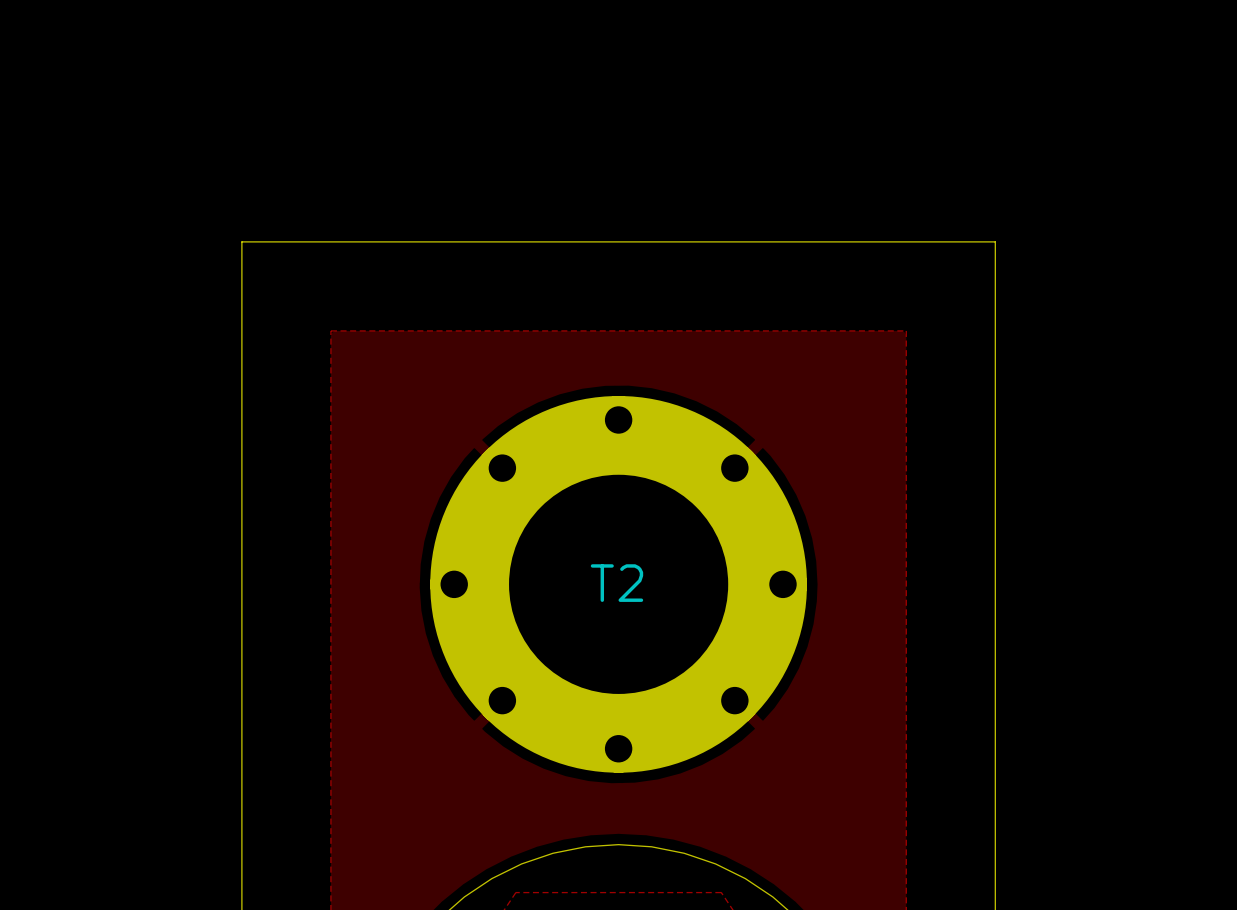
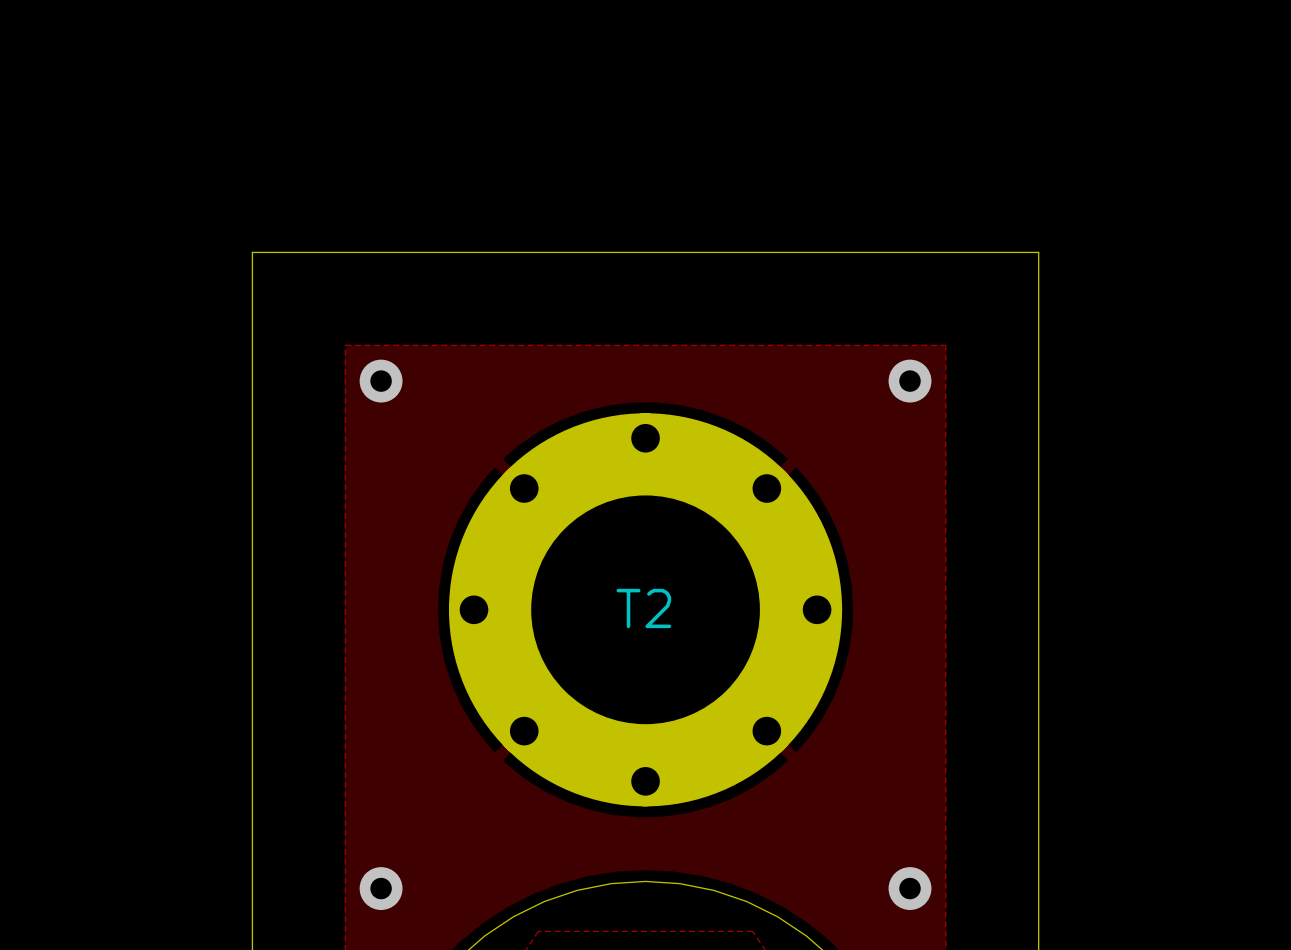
via: none -> (381, 381)
via: none -> (910, 381)
via: none -> (381, 888)
via: none -> (910, 888)

